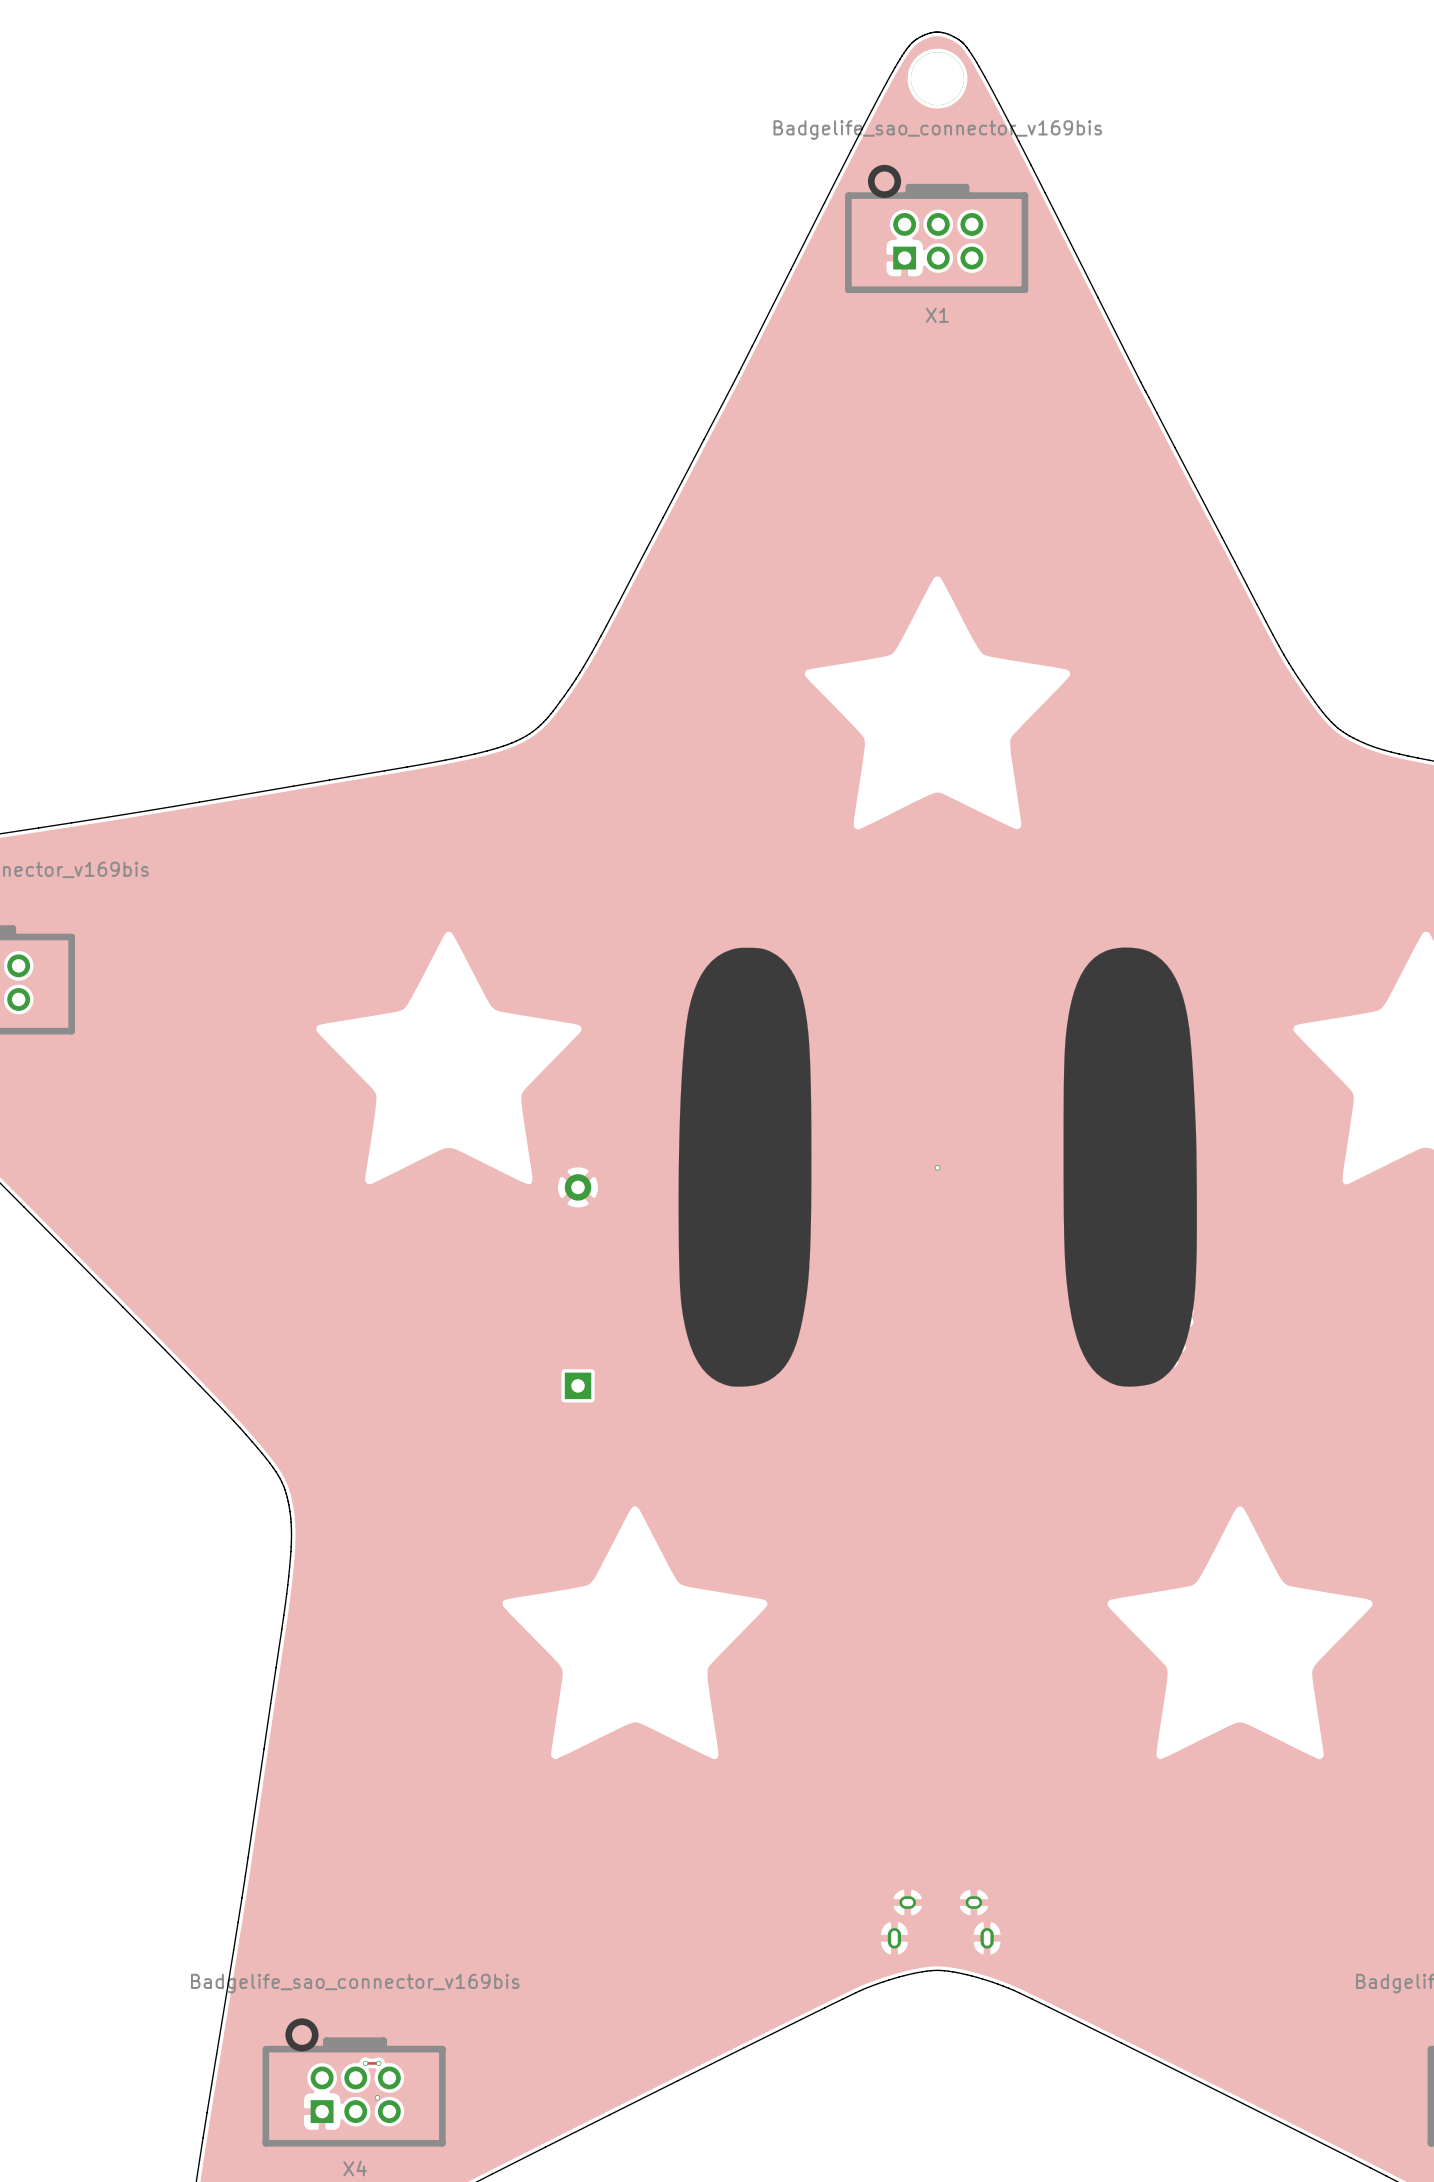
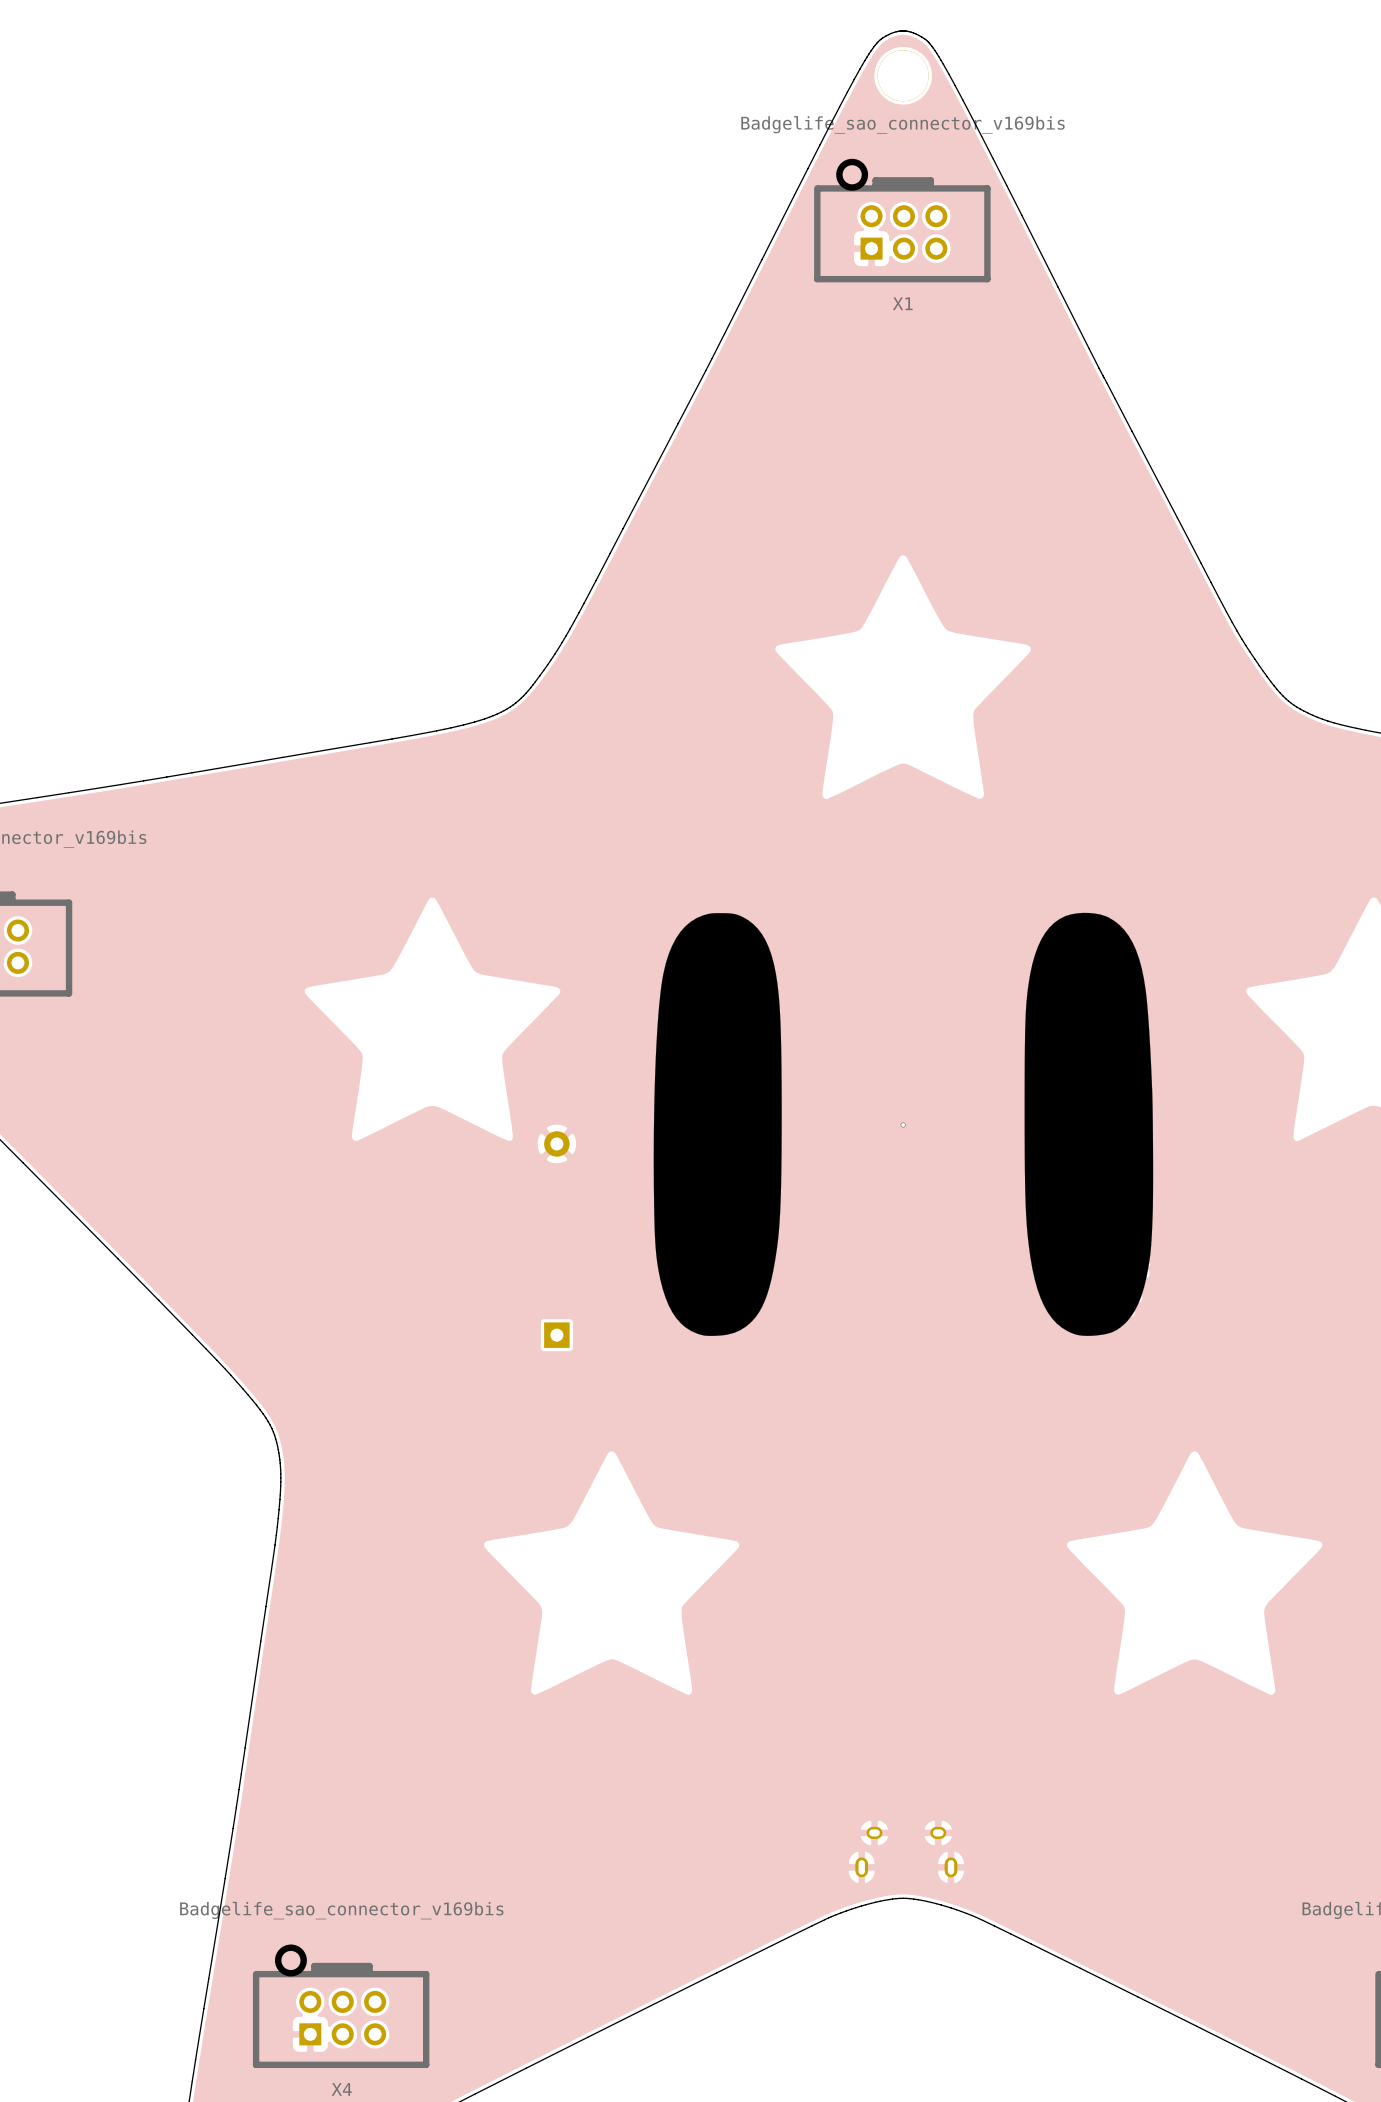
track: (365, 2063) (378, 2063) -> none
via: (365, 2063) -> none
via: (378, 2063) -> none
via: (377, 2097) -> none

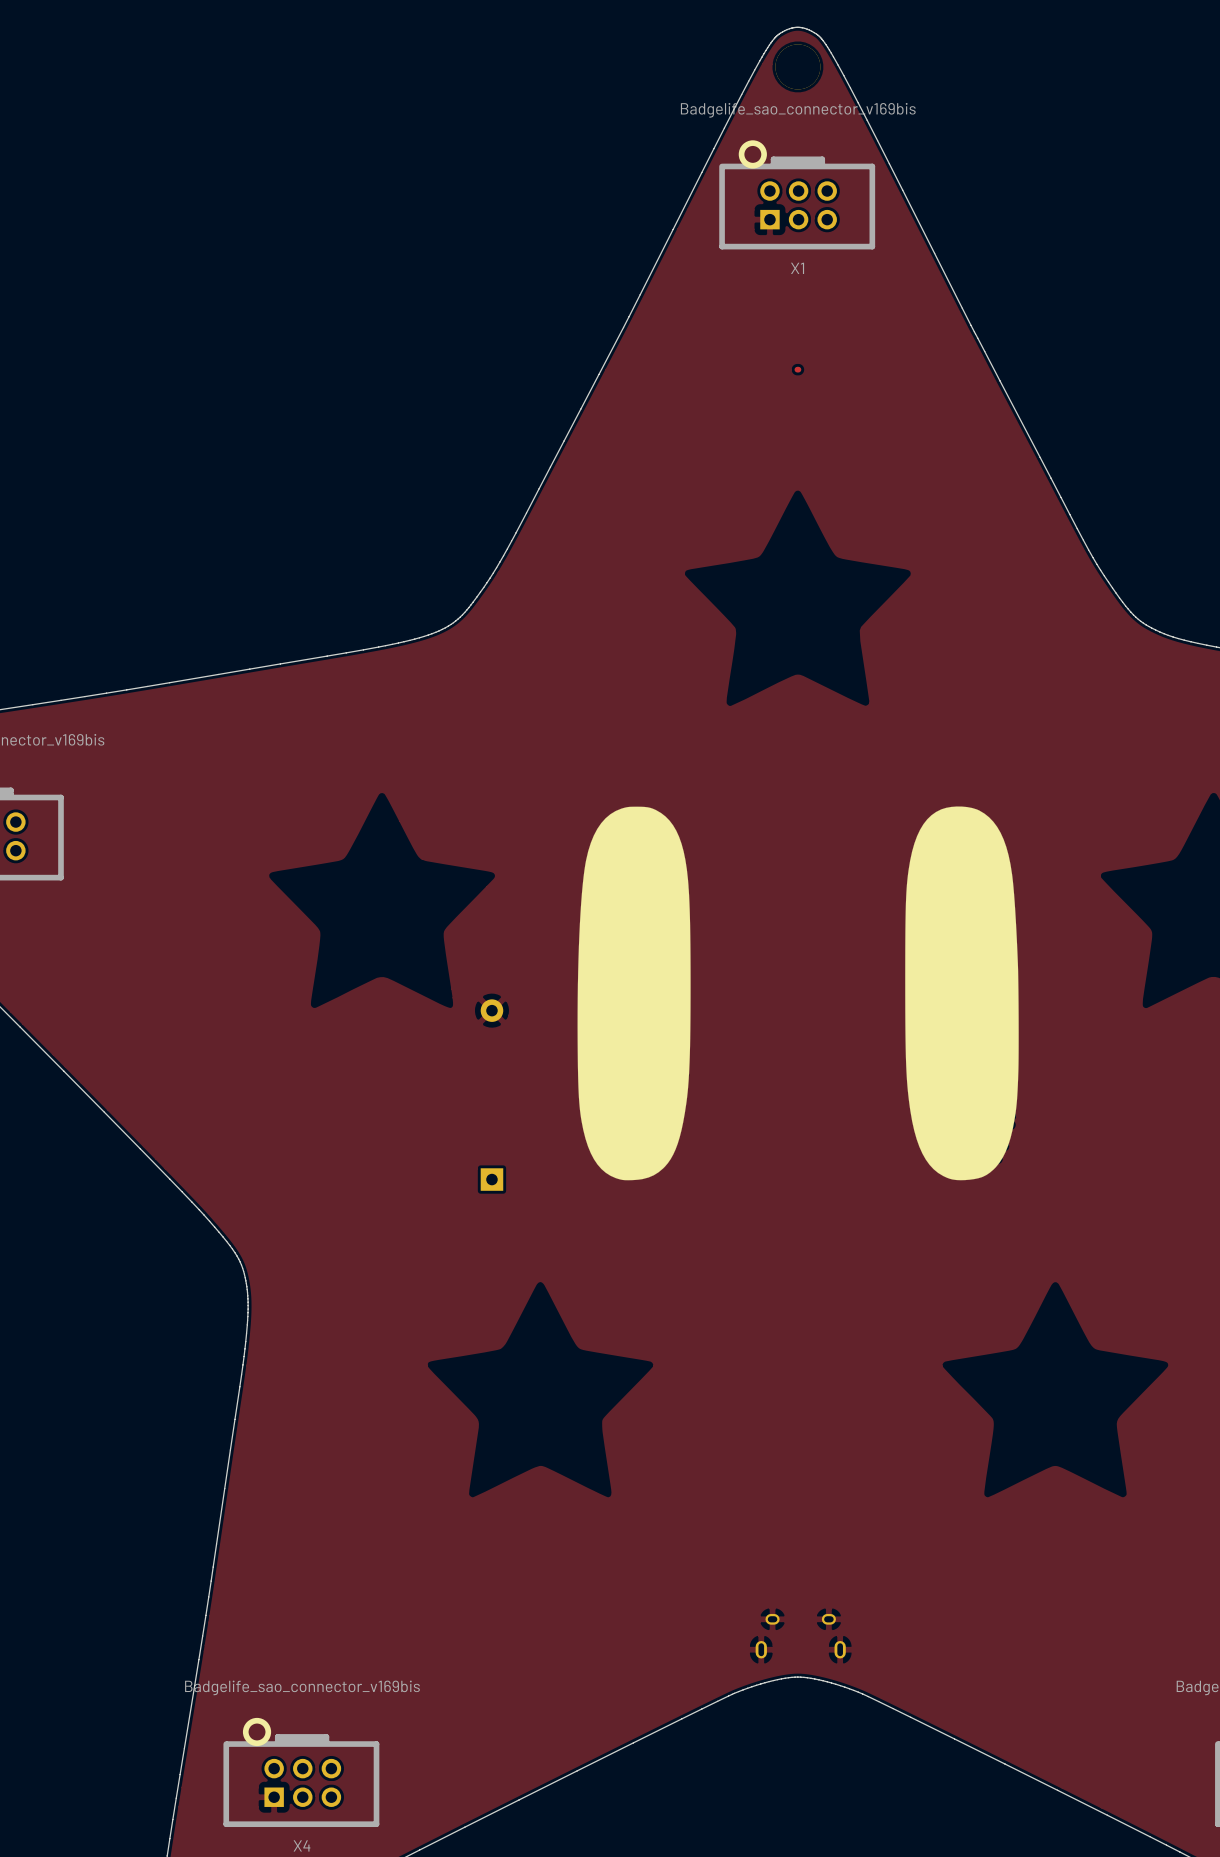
track: none -> (797, 369) (798, 369)
via: (903, 1125) -> none

